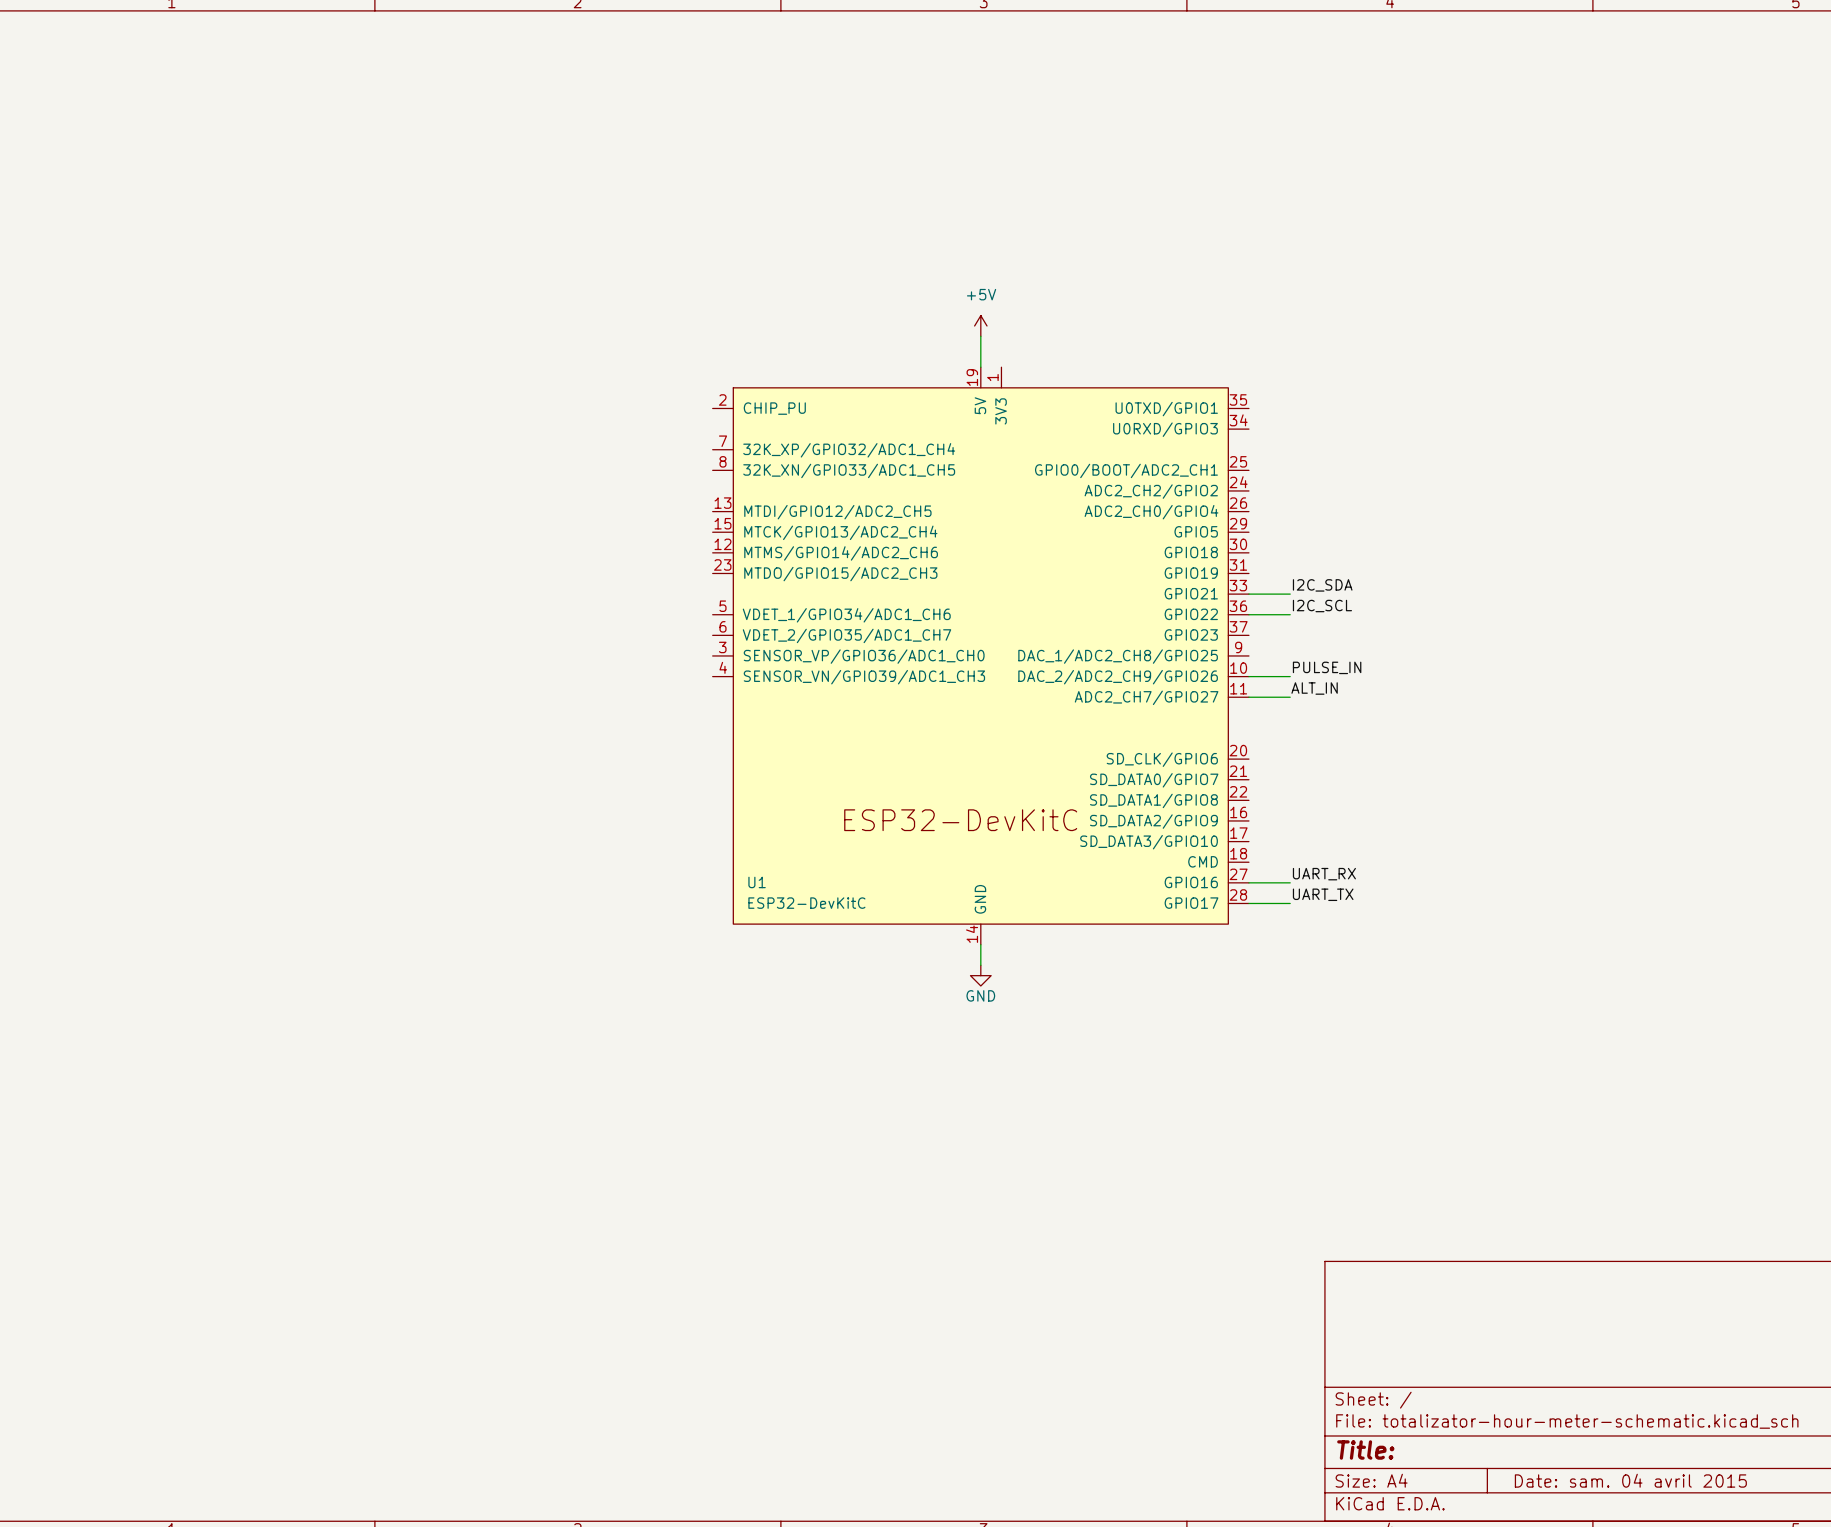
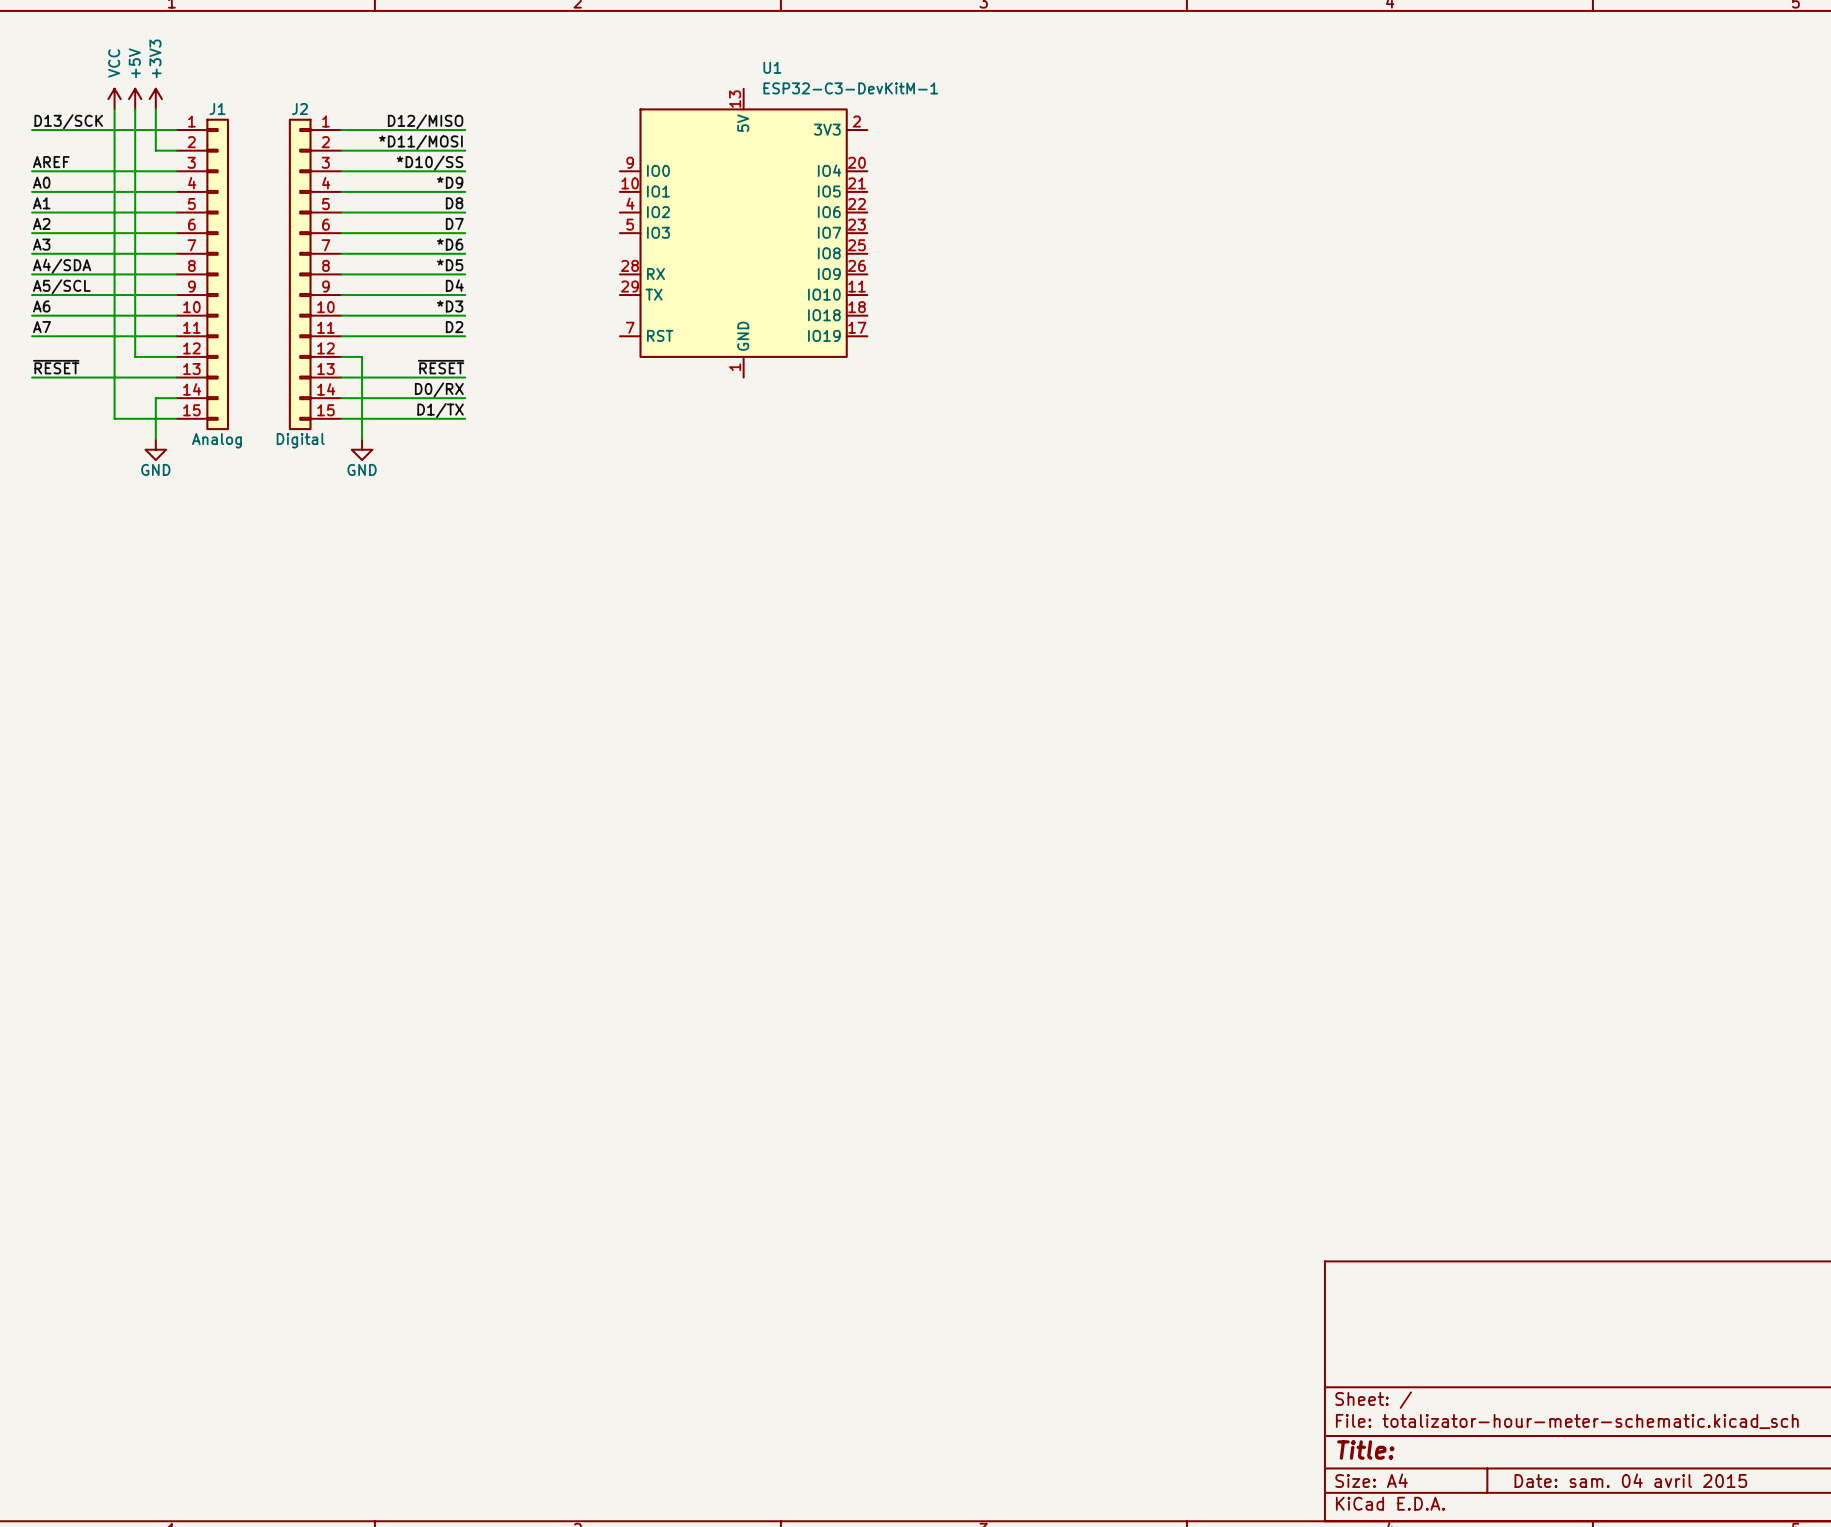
power symbol: none -> VCC (114, 99)
power symbol: none -> +5V (135, 99)
power symbol: none -> +3V3 (155, 99)
wire: none -> (114, 109) (114, 418) (176, 418)
wire: none -> (135, 109) (135, 356) (176, 356)
wire: none -> (155, 109) (155, 150) (176, 150)
label: none -> D13/SCK (68, 121)
label: none -> D12/MISO (425, 121)
wire: none -> (32, 130) (176, 130)
wire: none -> (341, 130) (465, 130)
label: none -> *D11/MOSI (420, 142)
wire: none -> (341, 150) (465, 150)
label: none -> AREF (51, 162)
label: none -> *D10/SS (430, 163)
wire: none -> (32, 171) (176, 171)
wire: none -> (341, 171) (465, 171)
label: none -> A0 (41, 182)
label: none -> *D9 (450, 182)
wire: none -> (32, 191) (176, 191)
wire: none -> (341, 191) (465, 191)
label: none -> A1 (41, 203)
label: none -> D8 (454, 203)
wire: none -> (32, 212) (176, 212)
wire: none -> (341, 212) (465, 212)
label: none -> A2 (41, 223)
label: none -> D7 (454, 223)
wire: none -> (32, 233) (176, 233)
wire: none -> (341, 233) (465, 233)
label: none -> A3 (41, 244)
label: none -> *D6 (450, 244)
wire: none -> (32, 253) (176, 253)
wire: none -> (341, 253) (465, 253)
label: none -> *D5 (450, 265)
label: none -> A4/SDA (62, 266)
wire: none -> (32, 274) (176, 274)
J1: none -> Analog (202, 274)
J2: none -> Digital (315, 274)
wire: none -> (341, 274) (465, 274)
label: none -> D4 (454, 285)
label: none -> A5/SCL (61, 286)
wire: none -> (32, 295) (176, 295)
wire: none -> (341, 295) (465, 295)
label: none -> A6 (41, 306)
label: none -> *D3 (450, 306)
wire: none -> (32, 315) (176, 315)
wire: none -> (341, 315) (465, 315)
power symbol: +5V (980, 325) -> none
label: none -> A7 (41, 327)
label: none -> D2 (454, 327)
wire: none -> (32, 336) (176, 336)
wire: none -> (341, 336) (465, 336)
wire: (980, 336) (980, 367) -> none
wire: none -> (341, 356) (362, 356) (362, 439)
label: none -> ~{RESET} (56, 367)
label: none -> ~{RESET} (441, 367)
U1 symbol: [712, 367, 1249, 945] -> [619, 88, 868, 378]
wire: none -> (32, 377) (176, 377)
wire: none -> (341, 377) (465, 377)
label: none -> D0/RX (439, 389)
wire: none -> (176, 398) (155, 398) (155, 439)
wire: none -> (341, 398) (465, 398)
label: none -> D1/TX (440, 410)
wire: none -> (341, 418) (465, 418)
power symbol: none -> GND (155, 449)
power symbol: none -> GND (362, 449)
label: I2C_SDA (1322, 585) -> none
wire: (1248, 594) (1290, 594) -> none
label: I2C_SCL (1322, 606) -> none
wire: (1248, 614) (1290, 614) -> none
label: PULSE_IN (1327, 667) -> none
wire: (1248, 676) (1290, 676) -> none
label: ALT_IN (1314, 688) -> none
wire: (1248, 697) (1290, 697) -> none
label: UART_RX (1324, 874) -> none
U1 name position: U1 (757, 882) -> U1 (772, 67)
wire: (1248, 882) (1290, 882) -> none
label: UART_TX (1323, 894) -> none
U1 value: ESP32-DevKitC (806, 903) -> ESP32-C3-DevKitM-1 (850, 88)
wire: (1248, 903) (1290, 903) -> none
wire: (980, 944) (980, 965) -> none
power symbol: GND (980, 975) -> none

